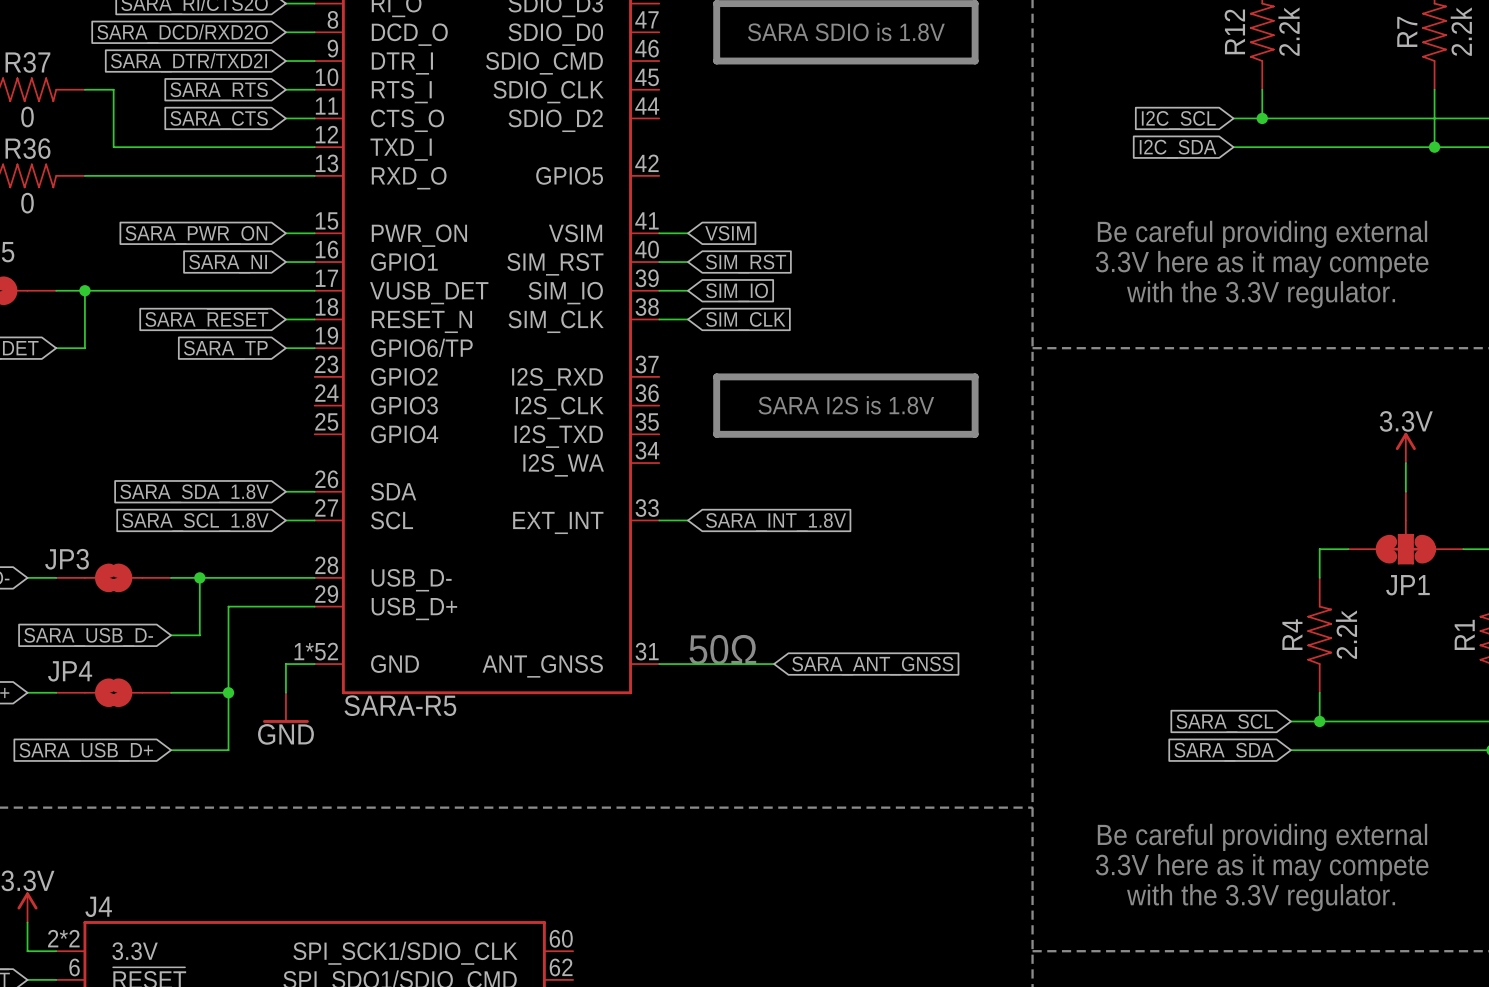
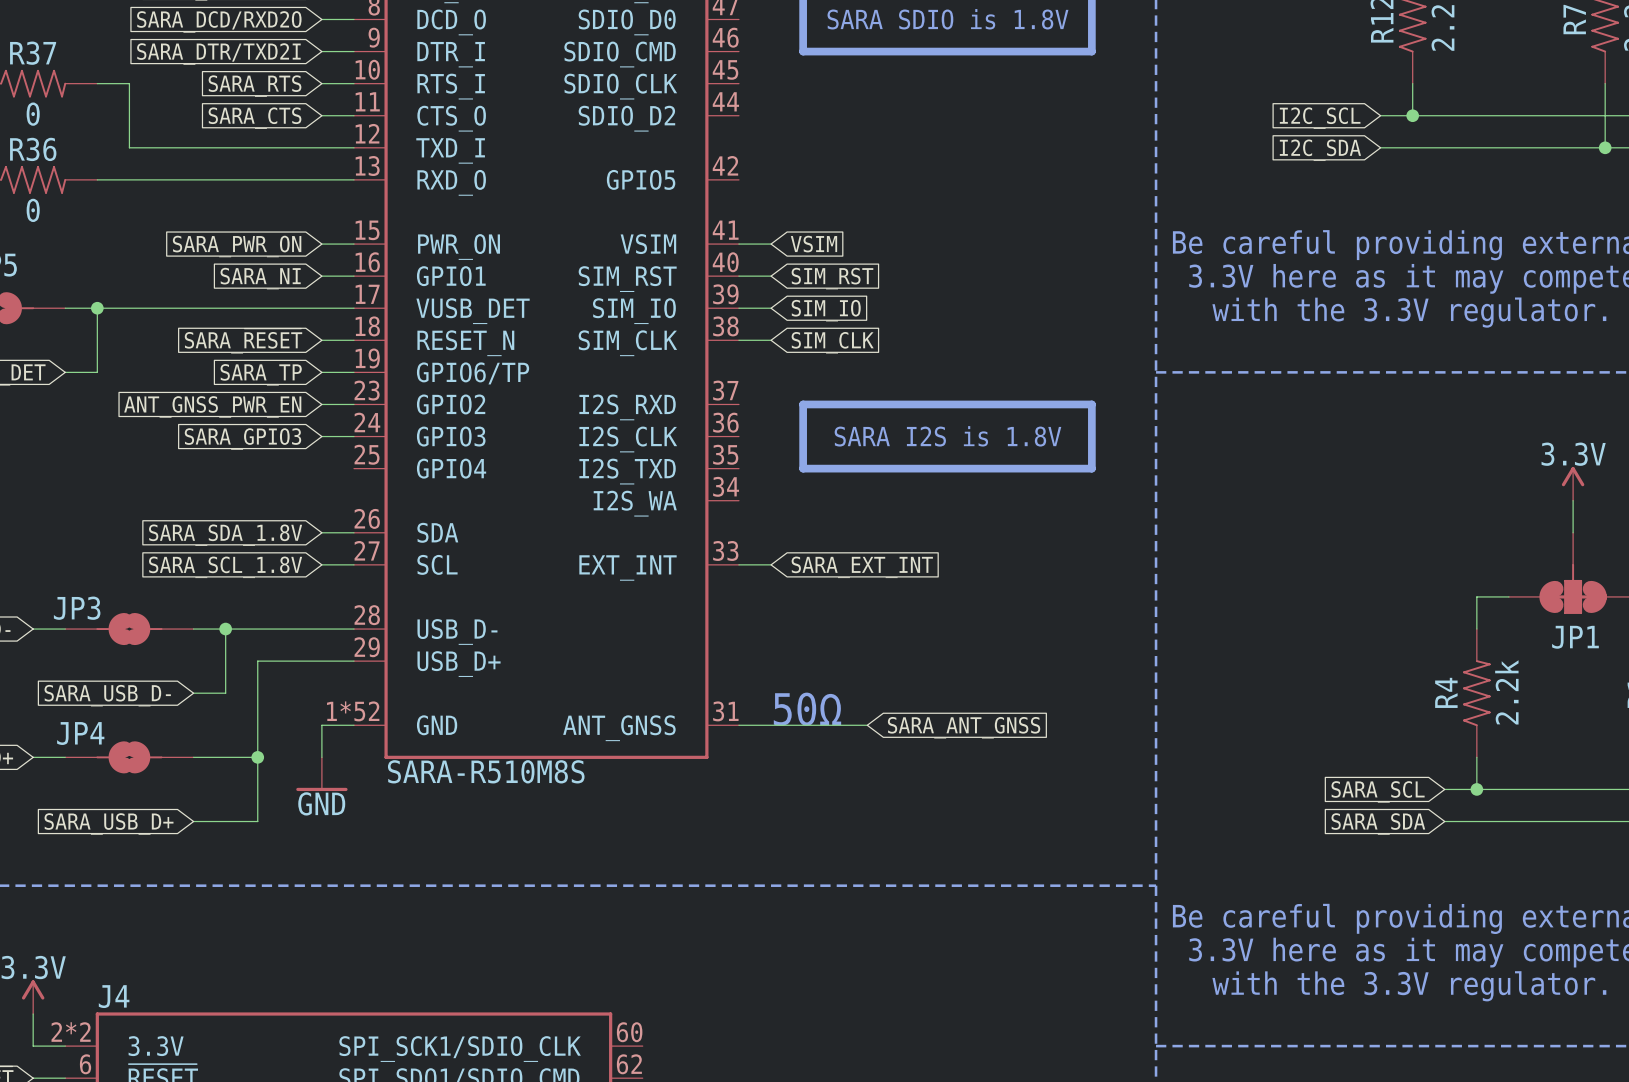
wire: none -> (321, 404) (353, 404)
global label: none -> ANT_GNSS_PWR_EN (212, 406)
wire: none -> (321, 436) (353, 436)
global label: none -> SARA_GPIO3 (242, 438)
global label: SARA_INT_1.8V (776, 522) -> SARA_EXT_INT (862, 567)
part value: SARA-R5 (400, 705) -> SARA-R510M8S (486, 771)

